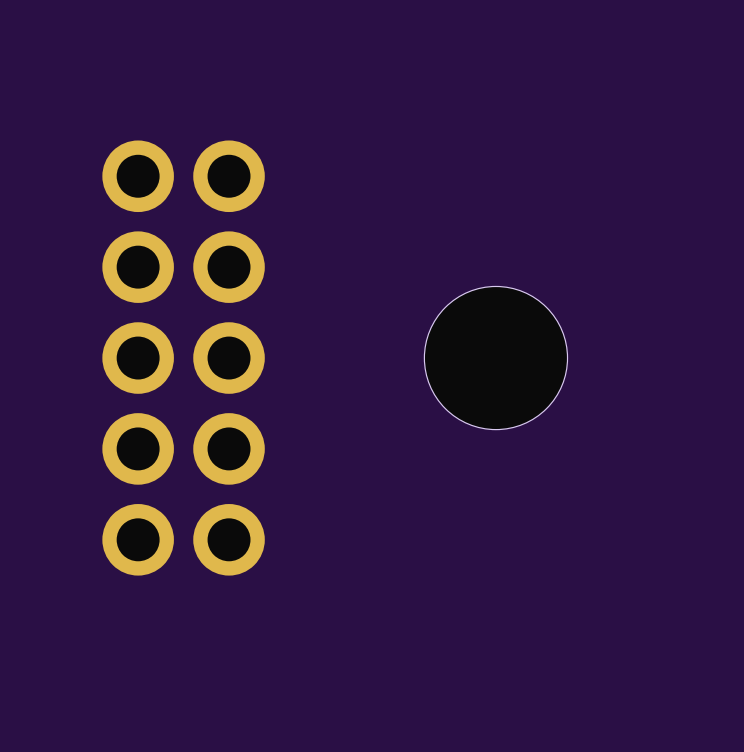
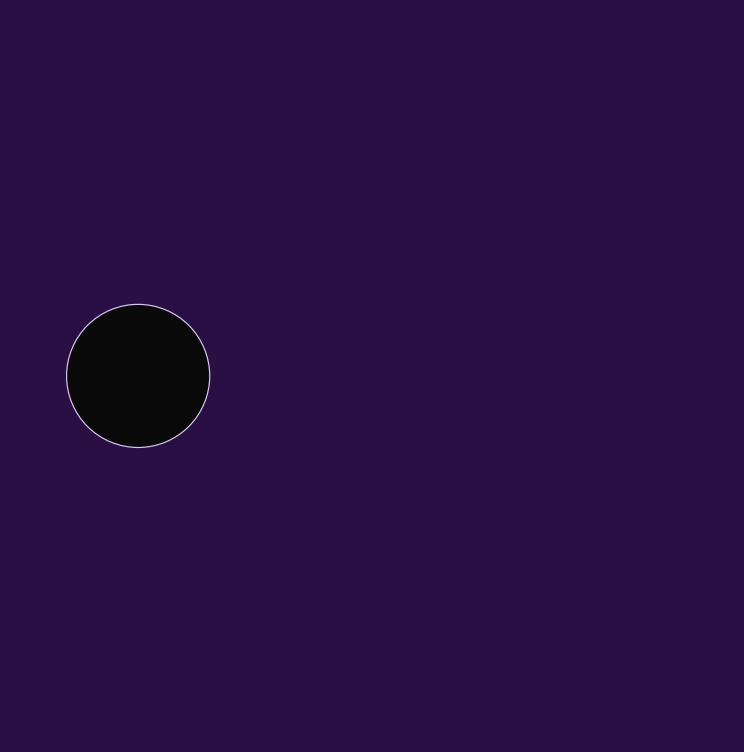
part footprint: [102, 140, 265, 576] -> [66, 304, 210, 448]
part: (495, 358) -> none

